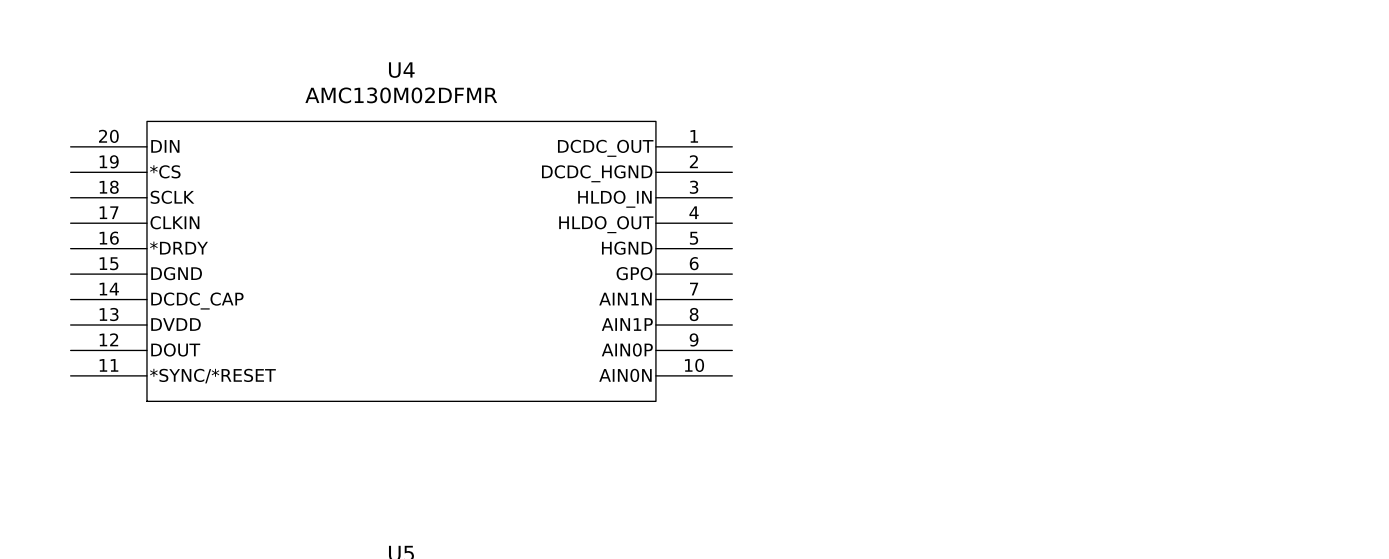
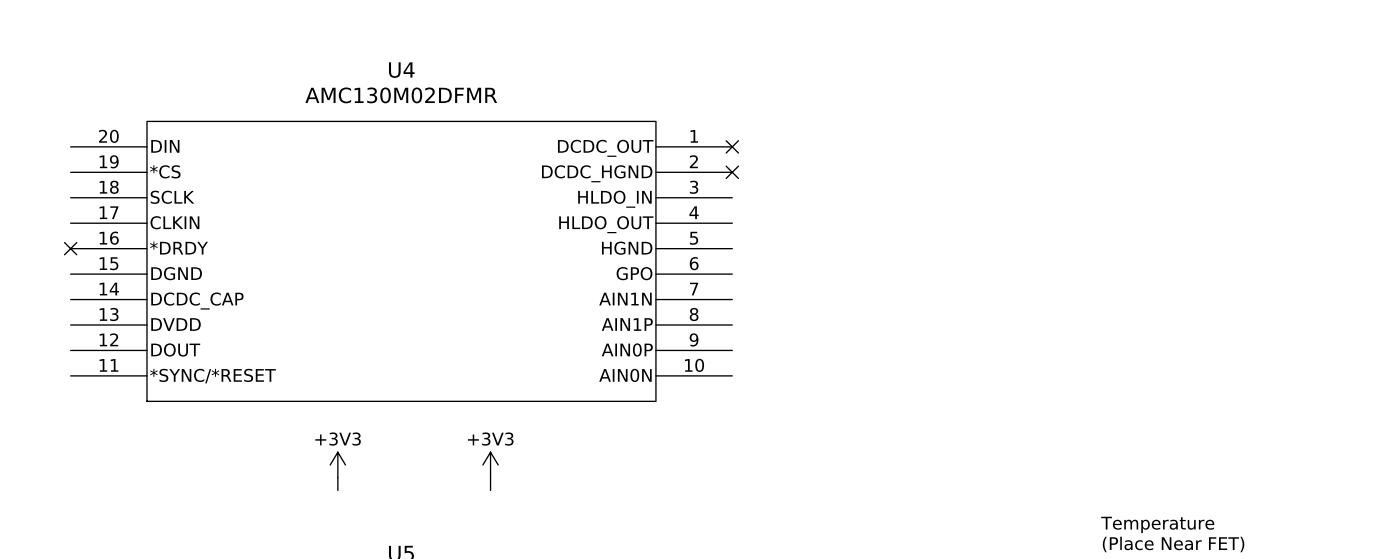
no-connect mark: none -> (732, 146)
no-connect mark: none -> (732, 172)
no-connect mark: none -> (70, 248)
power symbol: none -> +3V3 (337, 464)
power symbol: none -> +3V3 (490, 464)
wire: none -> (337, 477) (337, 490)
wire: none -> (490, 477) (490, 490)
text: none -> Temperature (1157, 524)
text: none -> (Place Near FET) (1173, 544)

